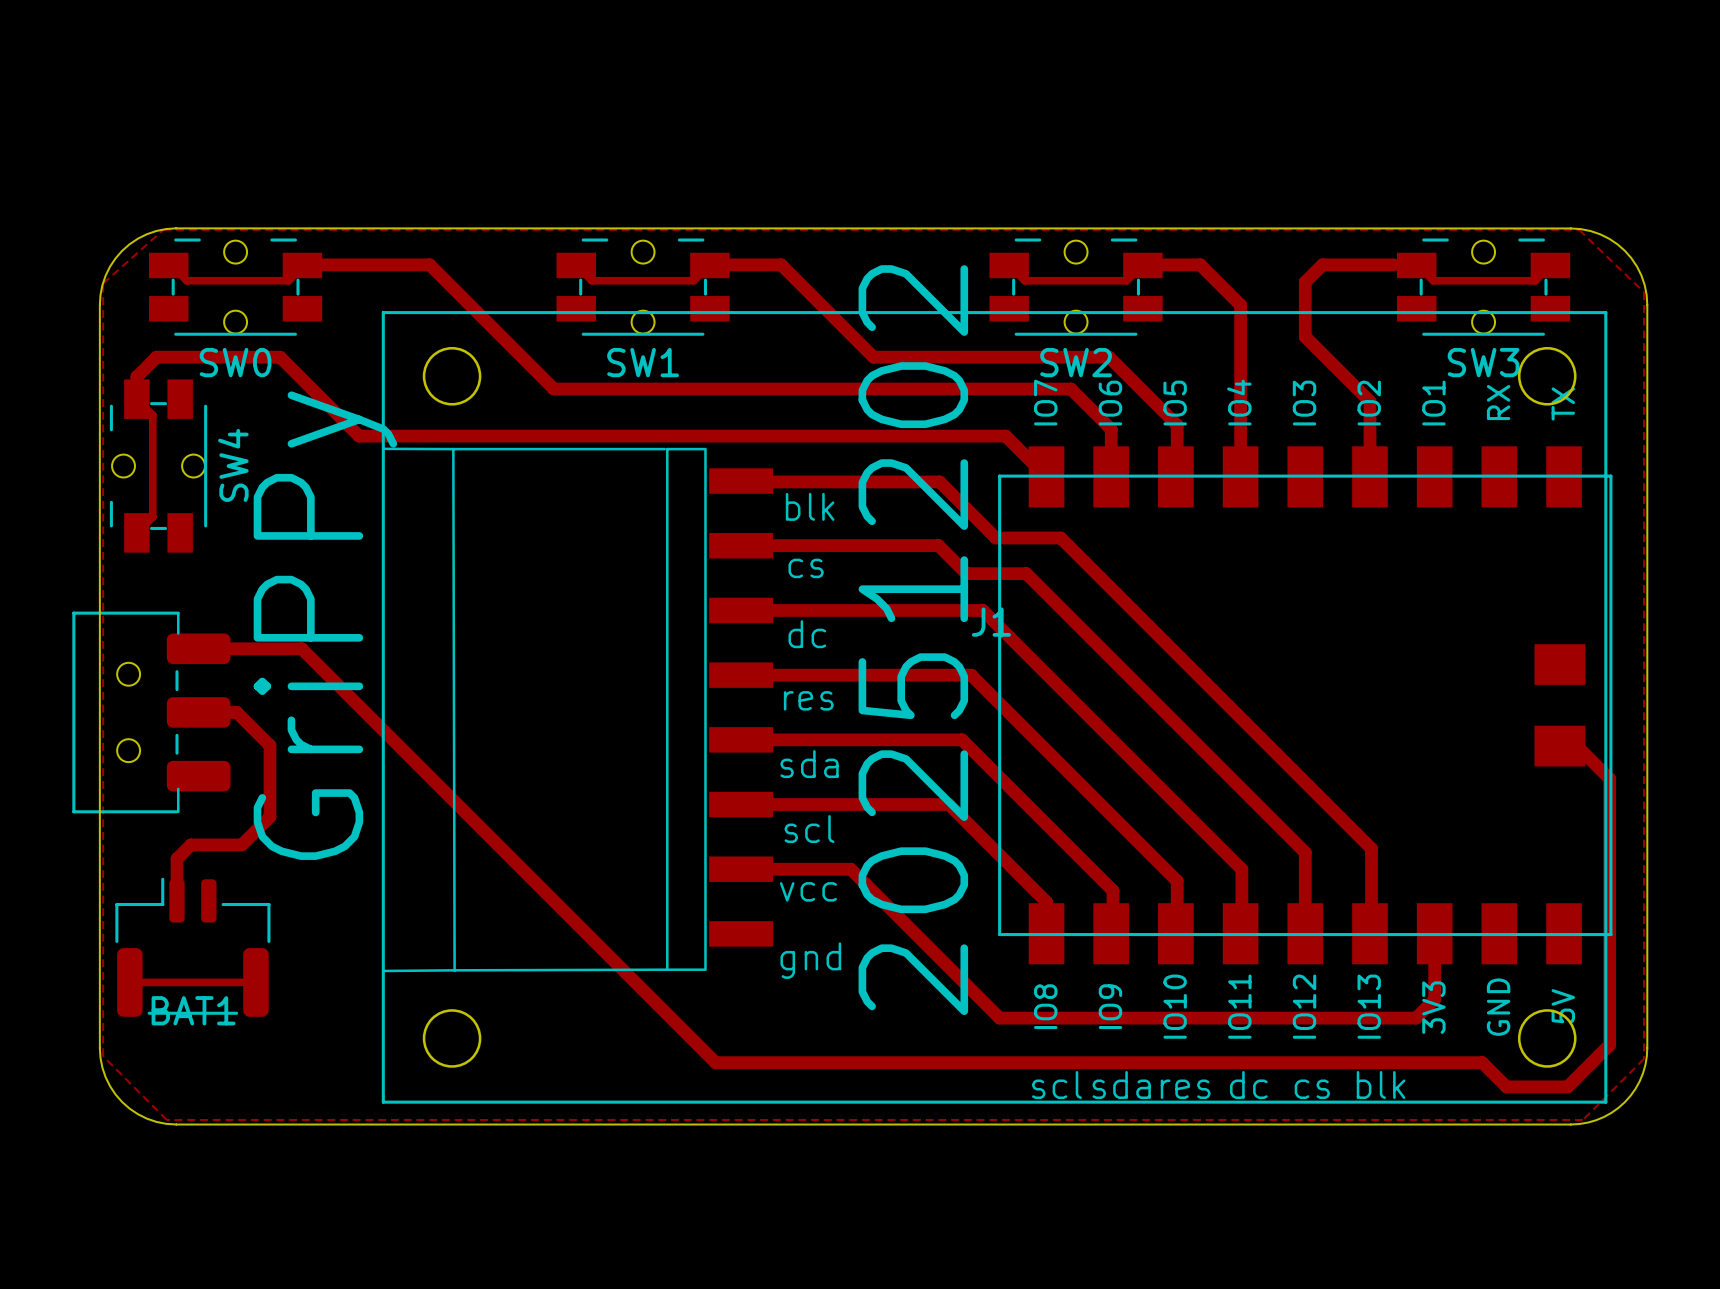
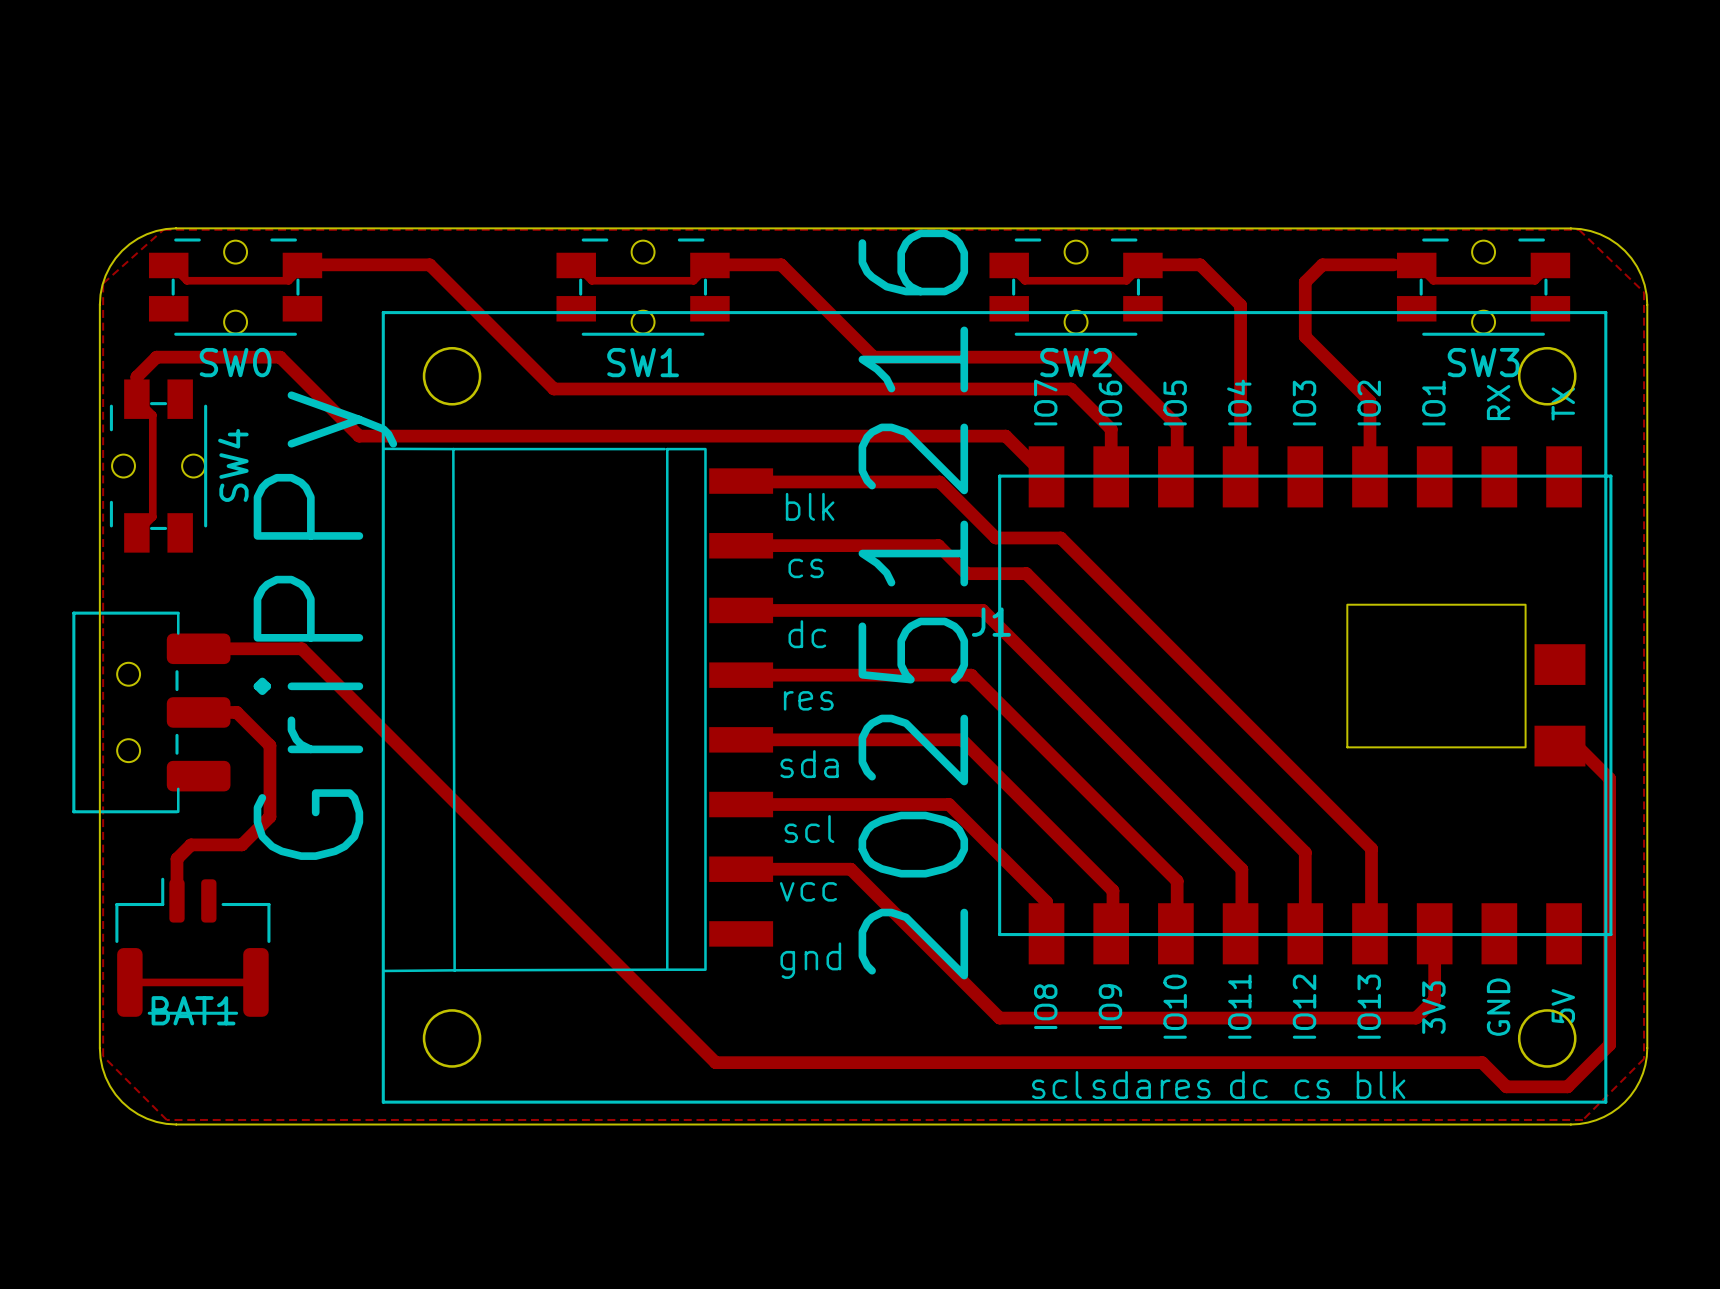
part footprint: [998, 446, 1613, 965] -> [998, 446, 1613, 965]
text: 20251202 (913, 640) -> 20251216 (913, 604)

